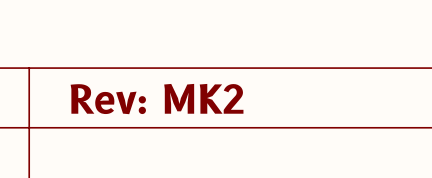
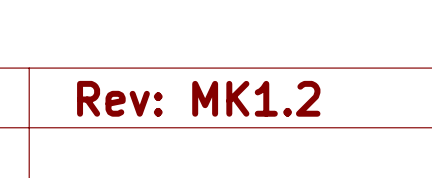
title block: Rev: MK2 (157, 99) -> Rev: MK1.2 (198, 98)

